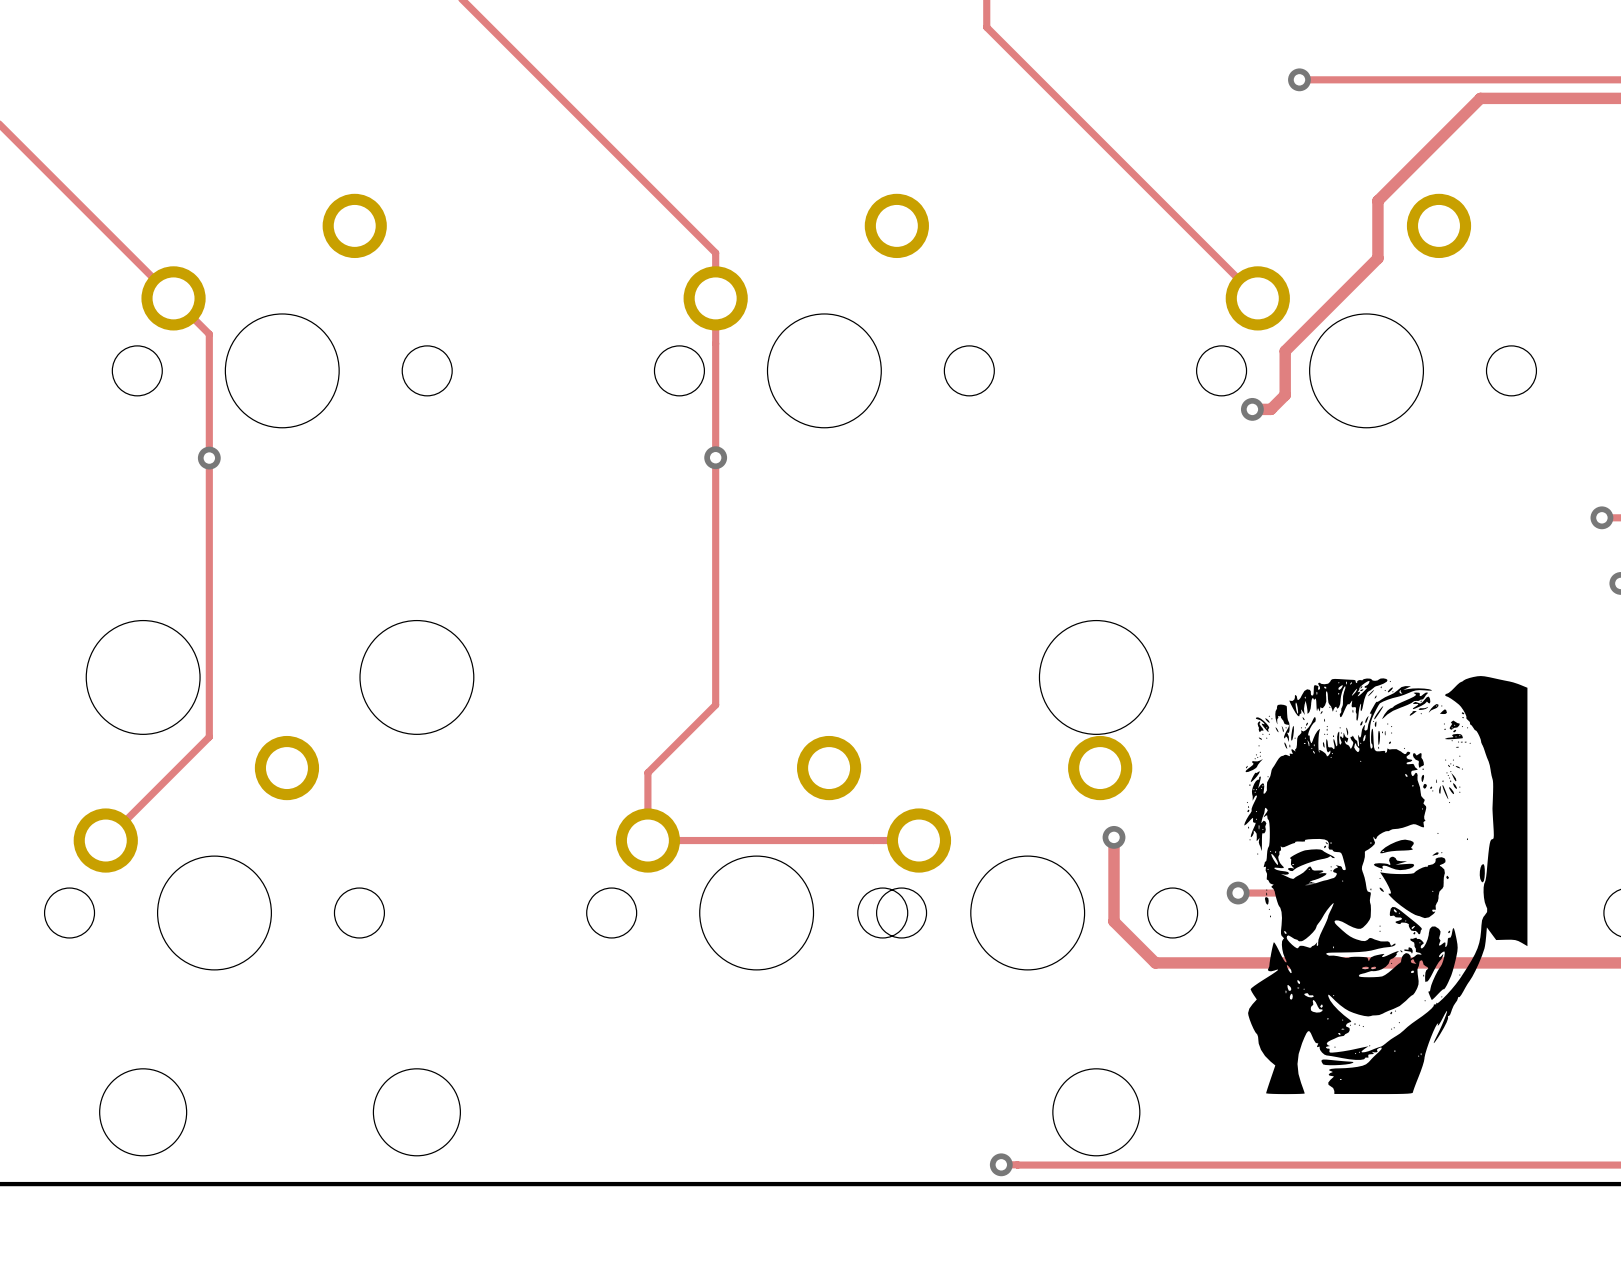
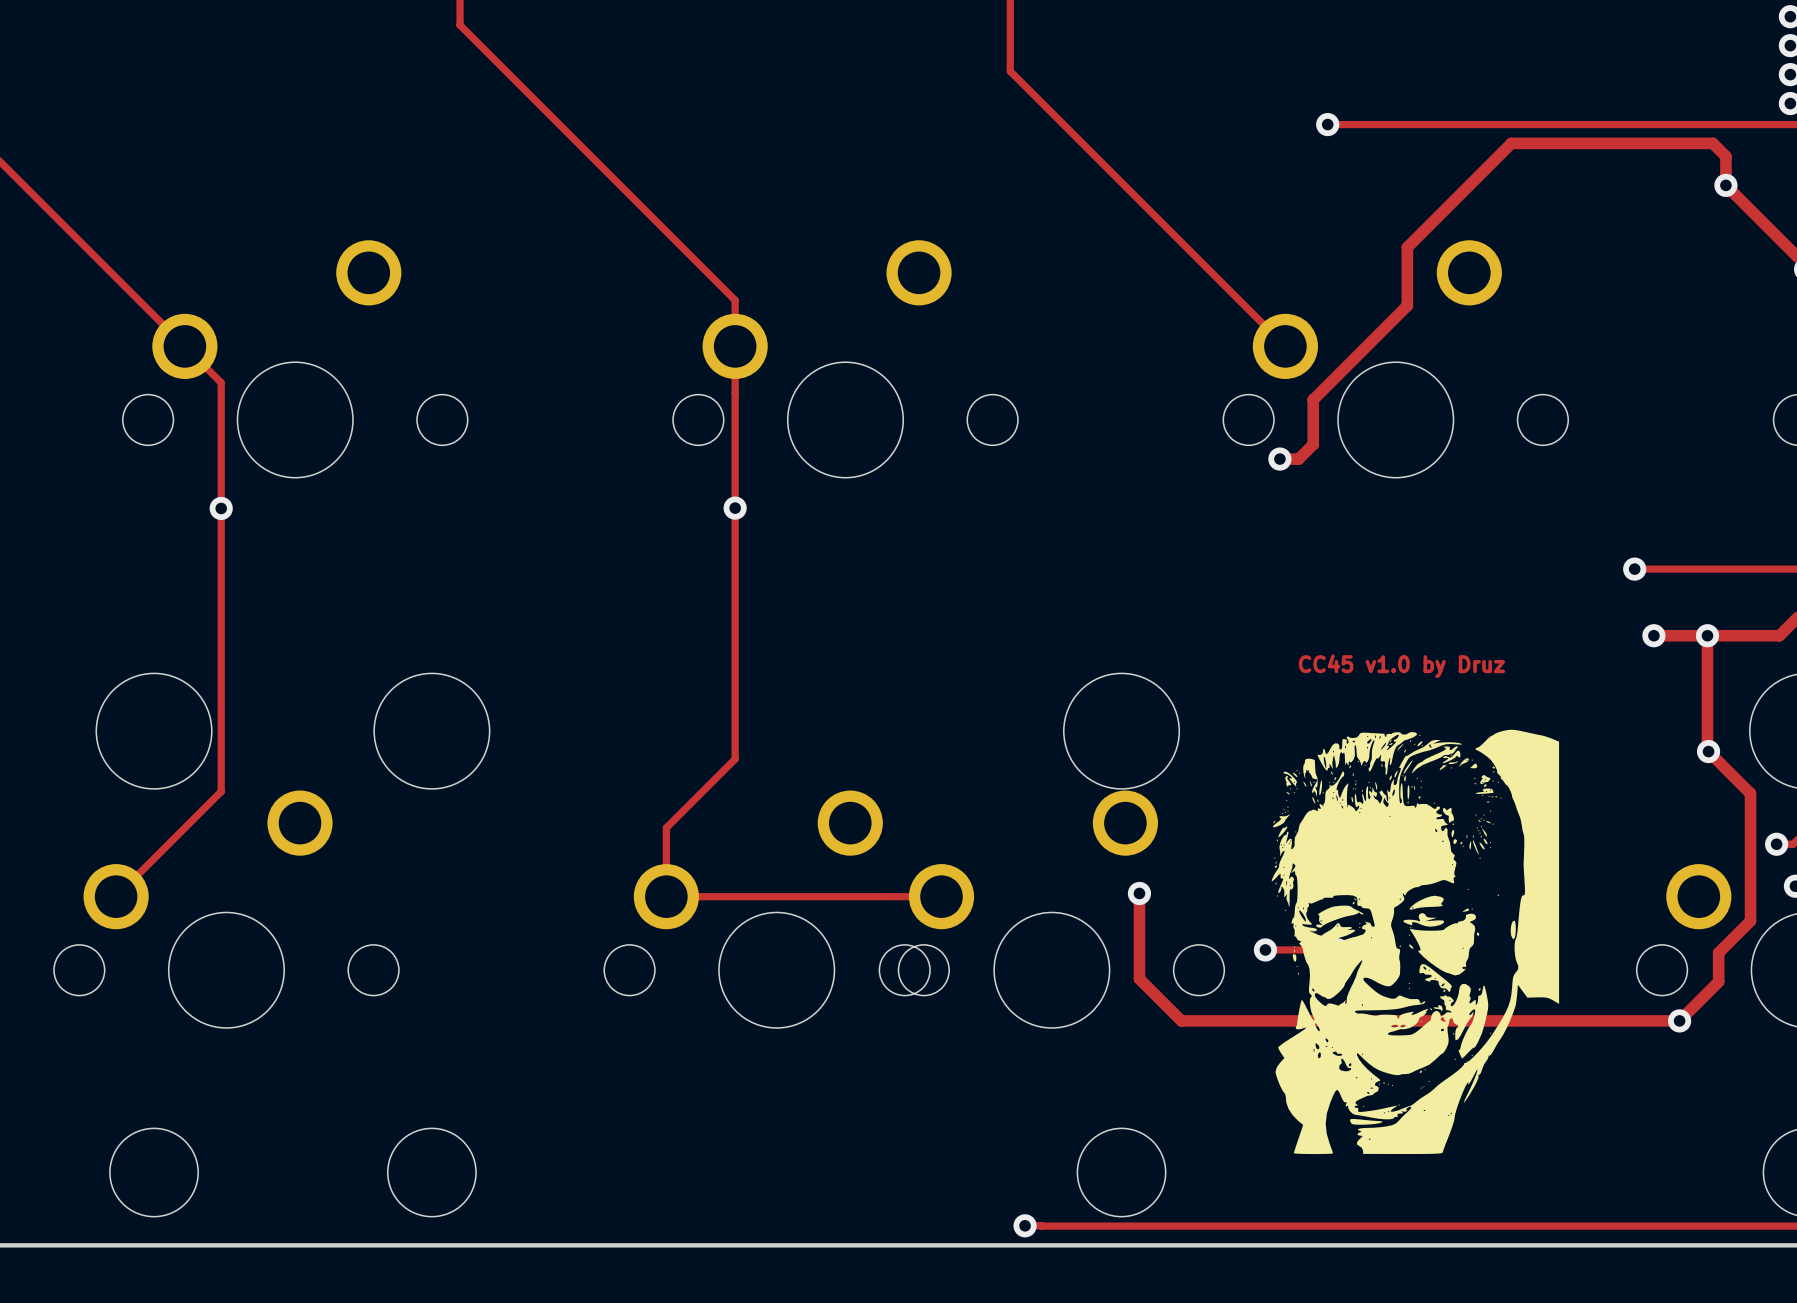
text: none -> CC45 v1.0 by Druz (1401, 666)

